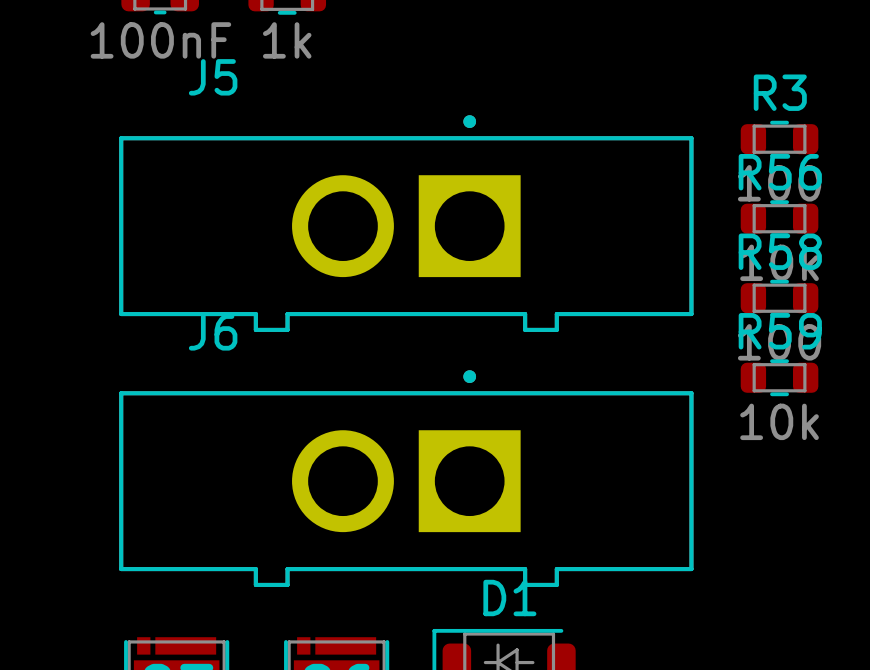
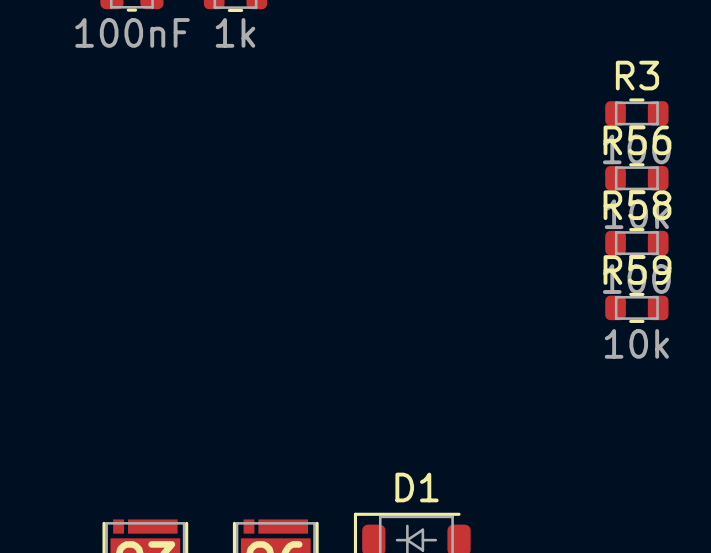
J5: (406, 223) -> none
J6: (406, 478) -> none

